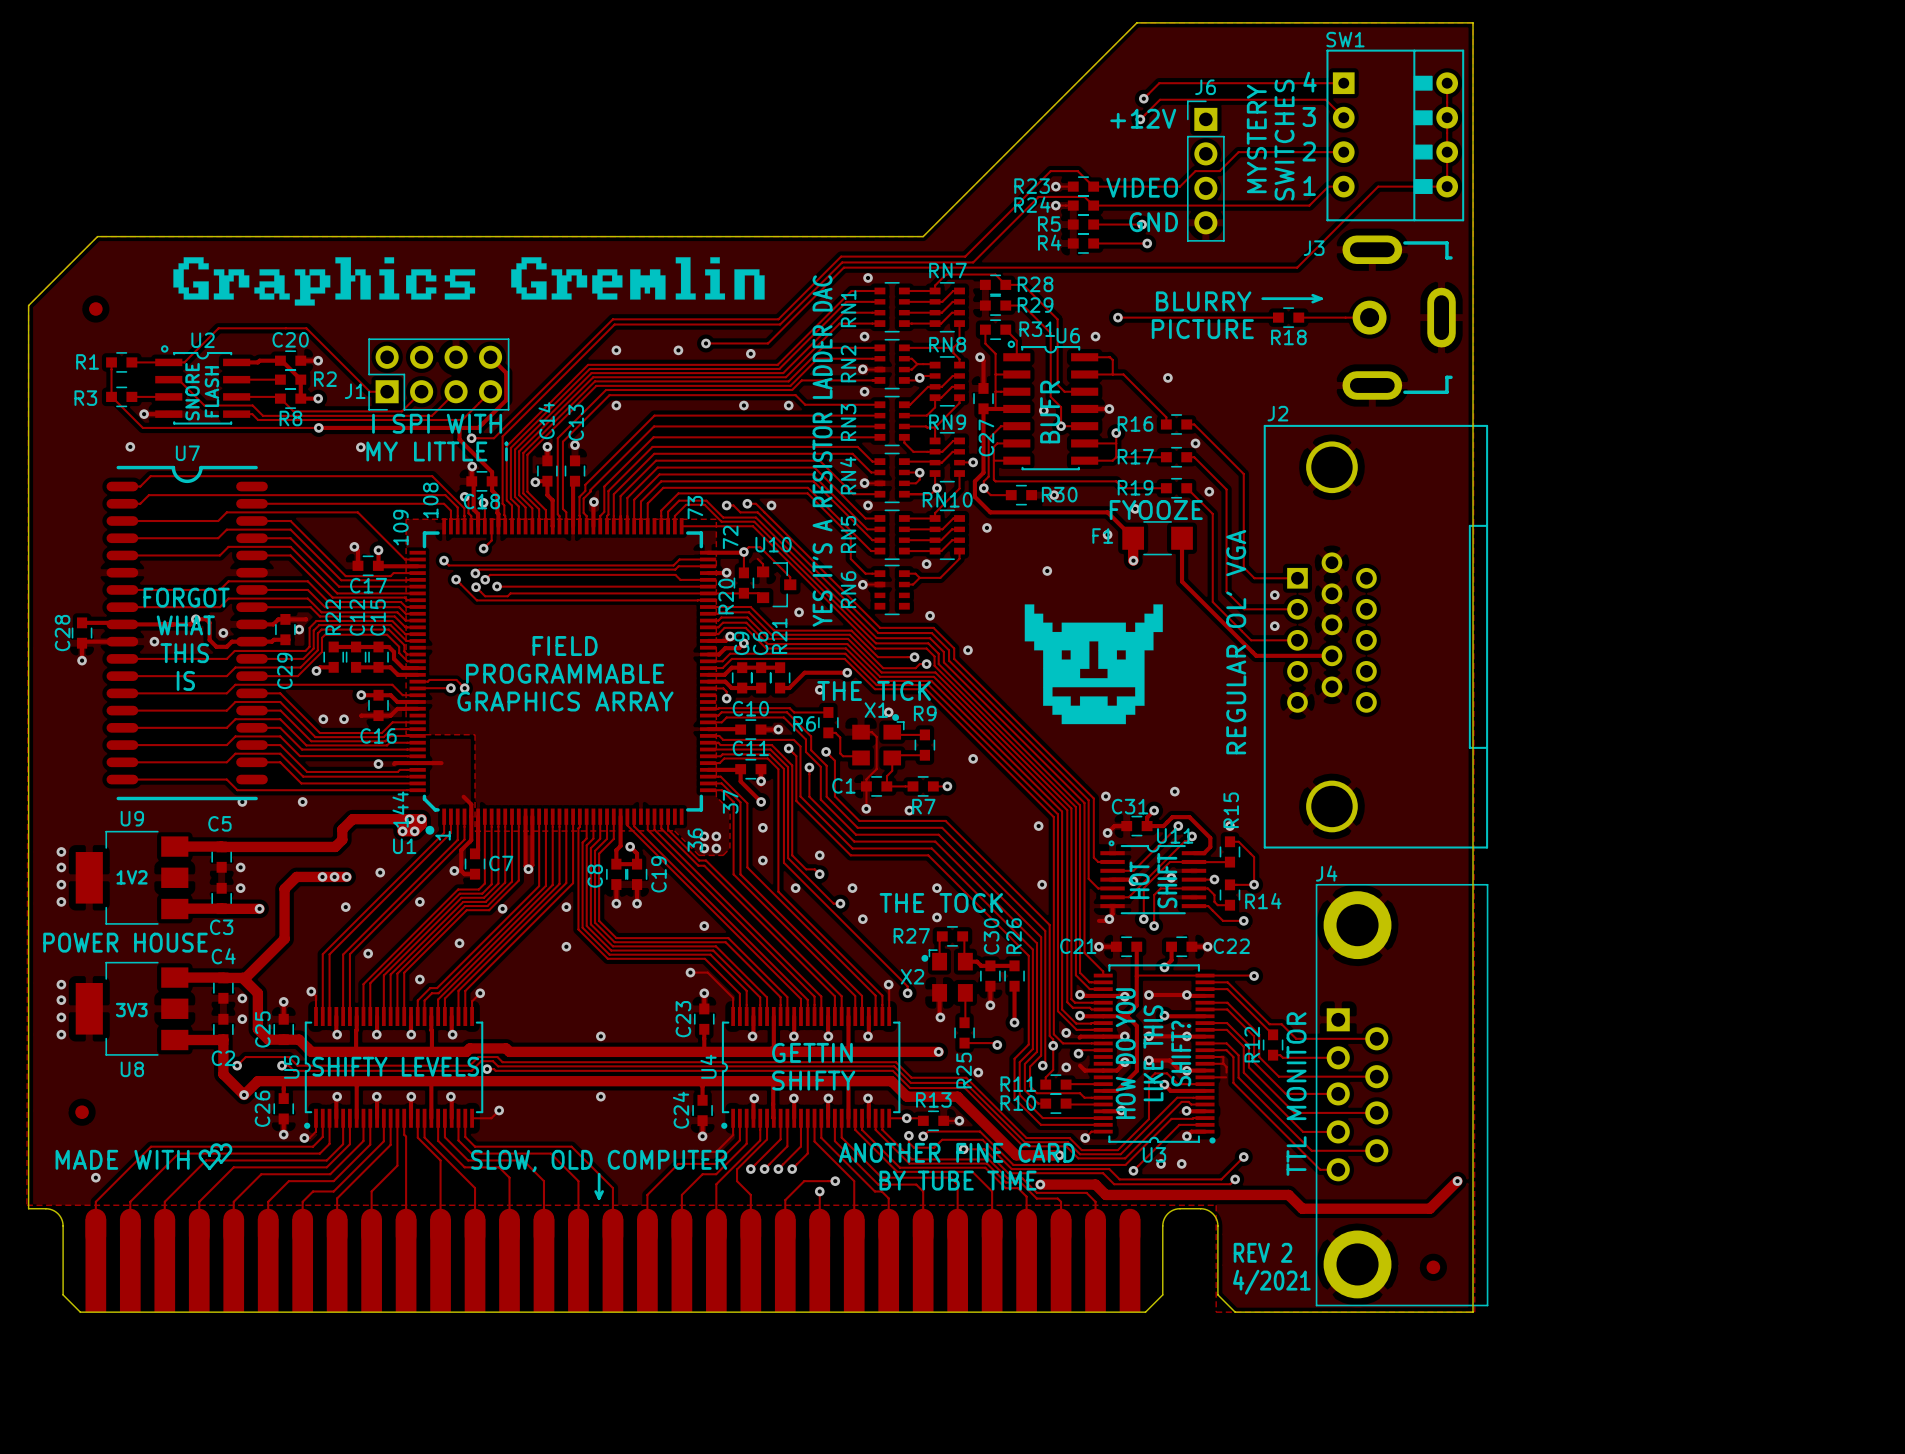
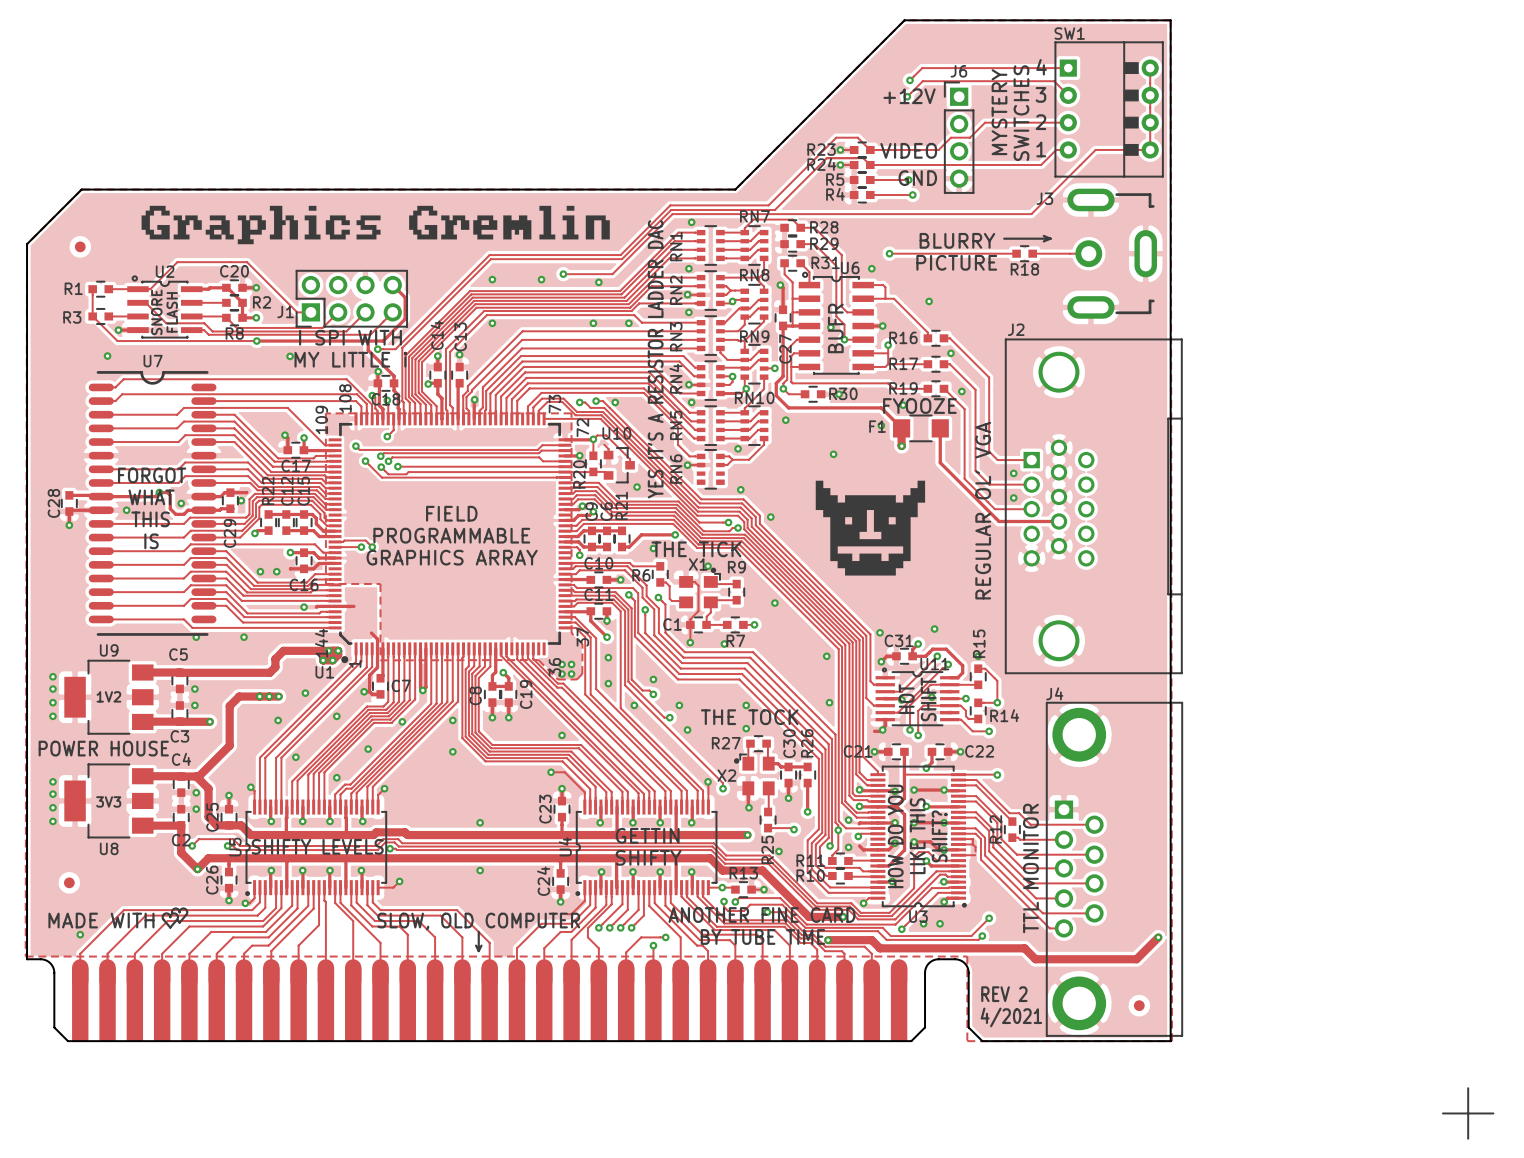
line: none -> (1468, 1088) (1468, 1138)
line: none -> (1442, 1113) (1493, 1113)

